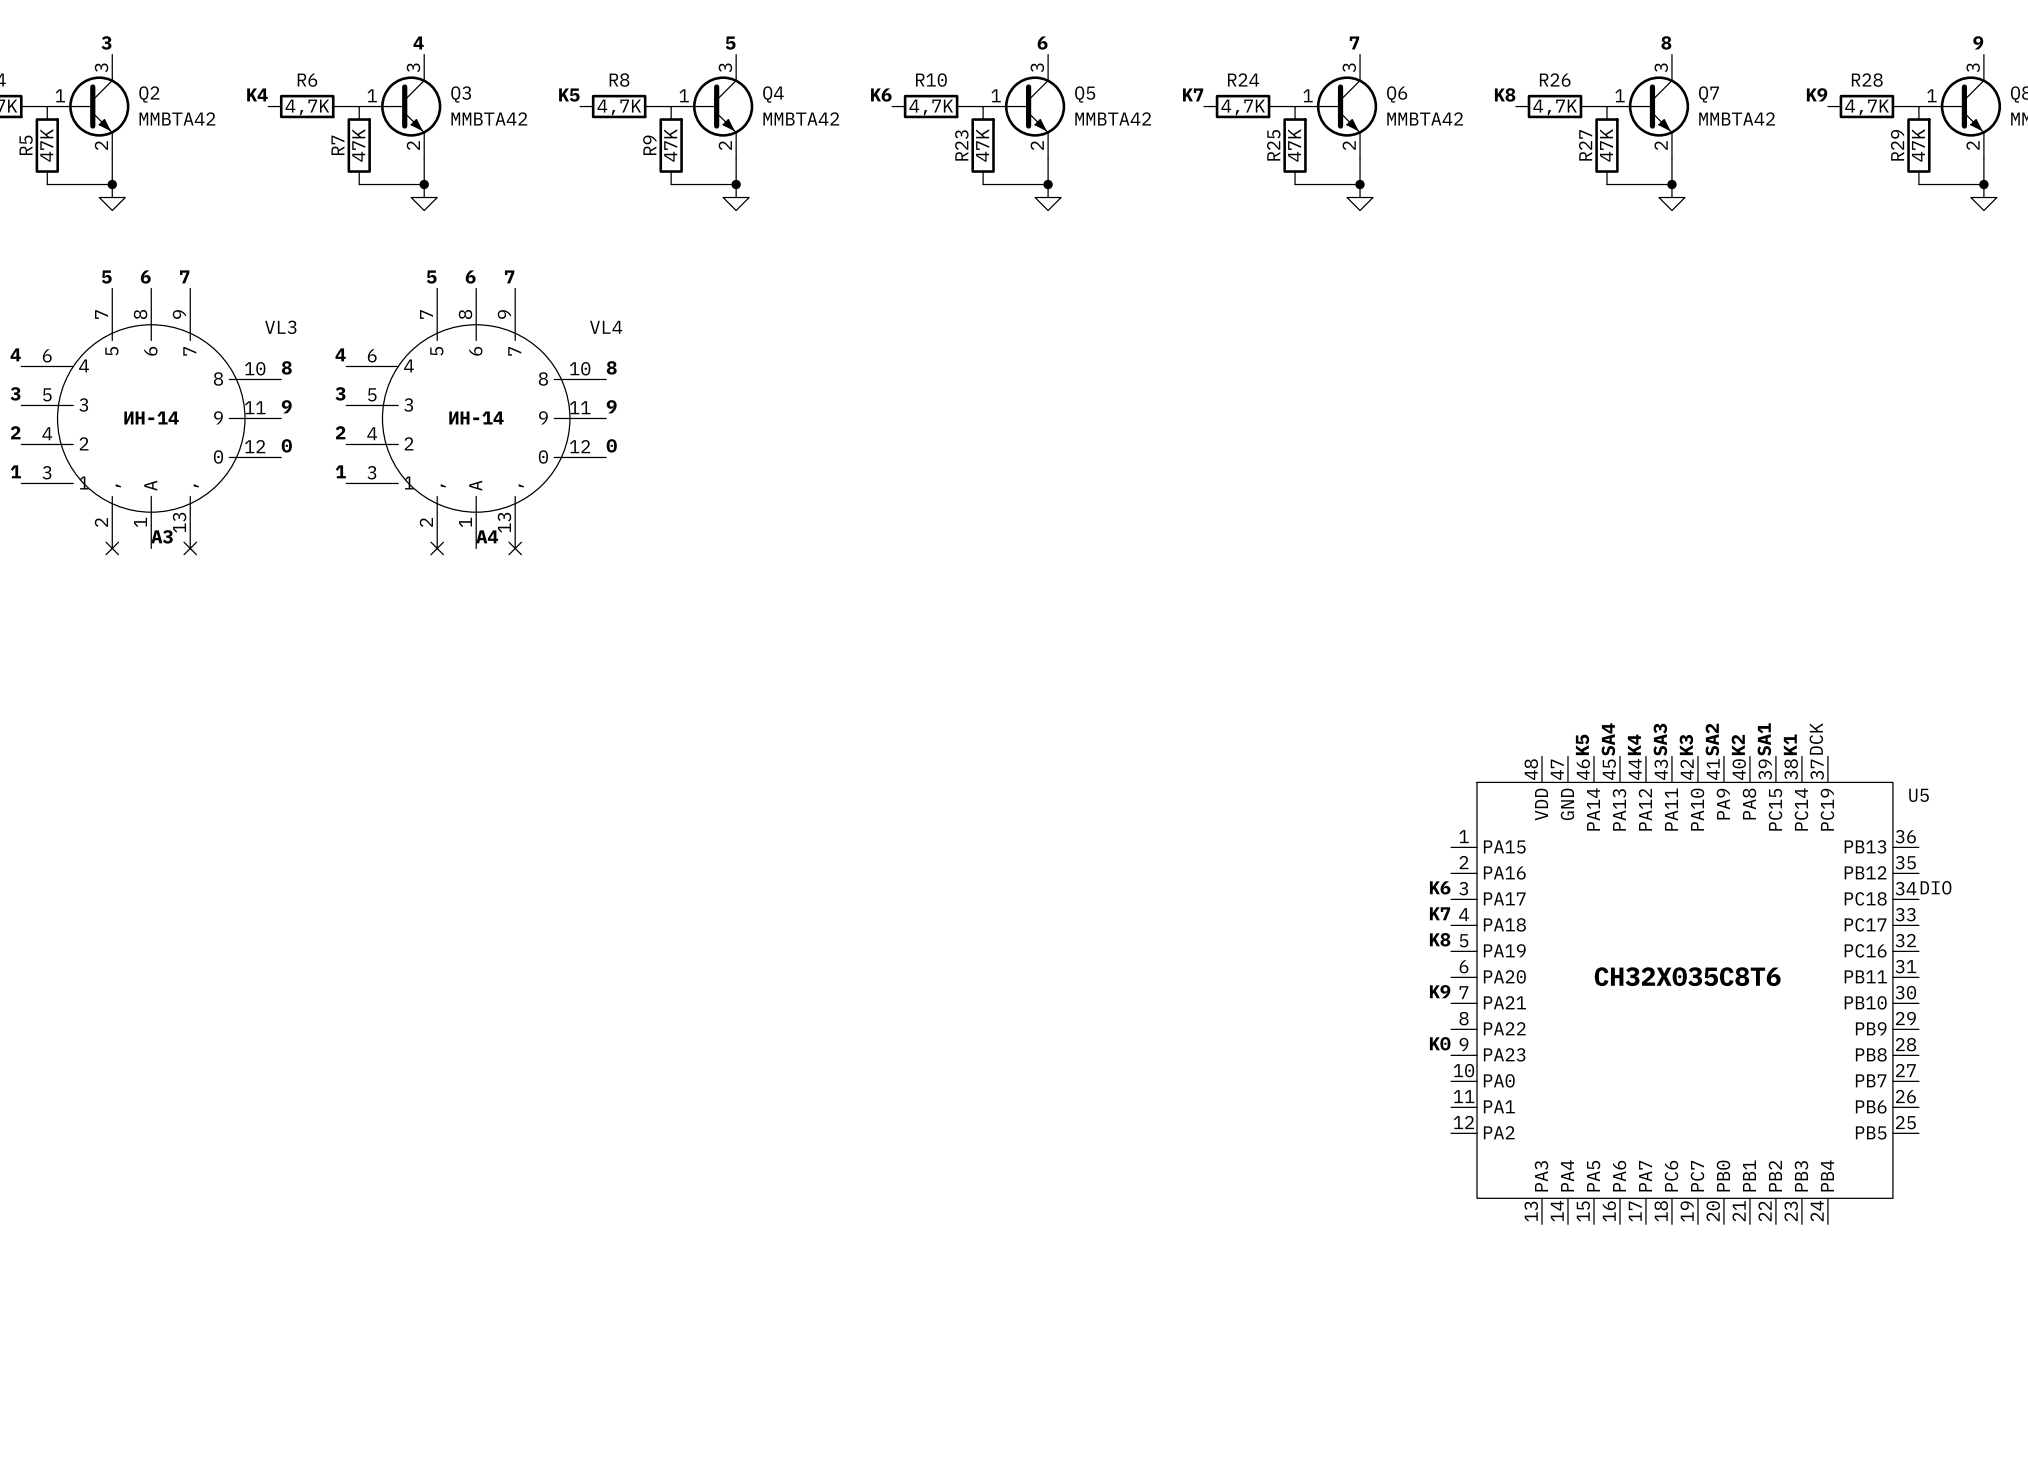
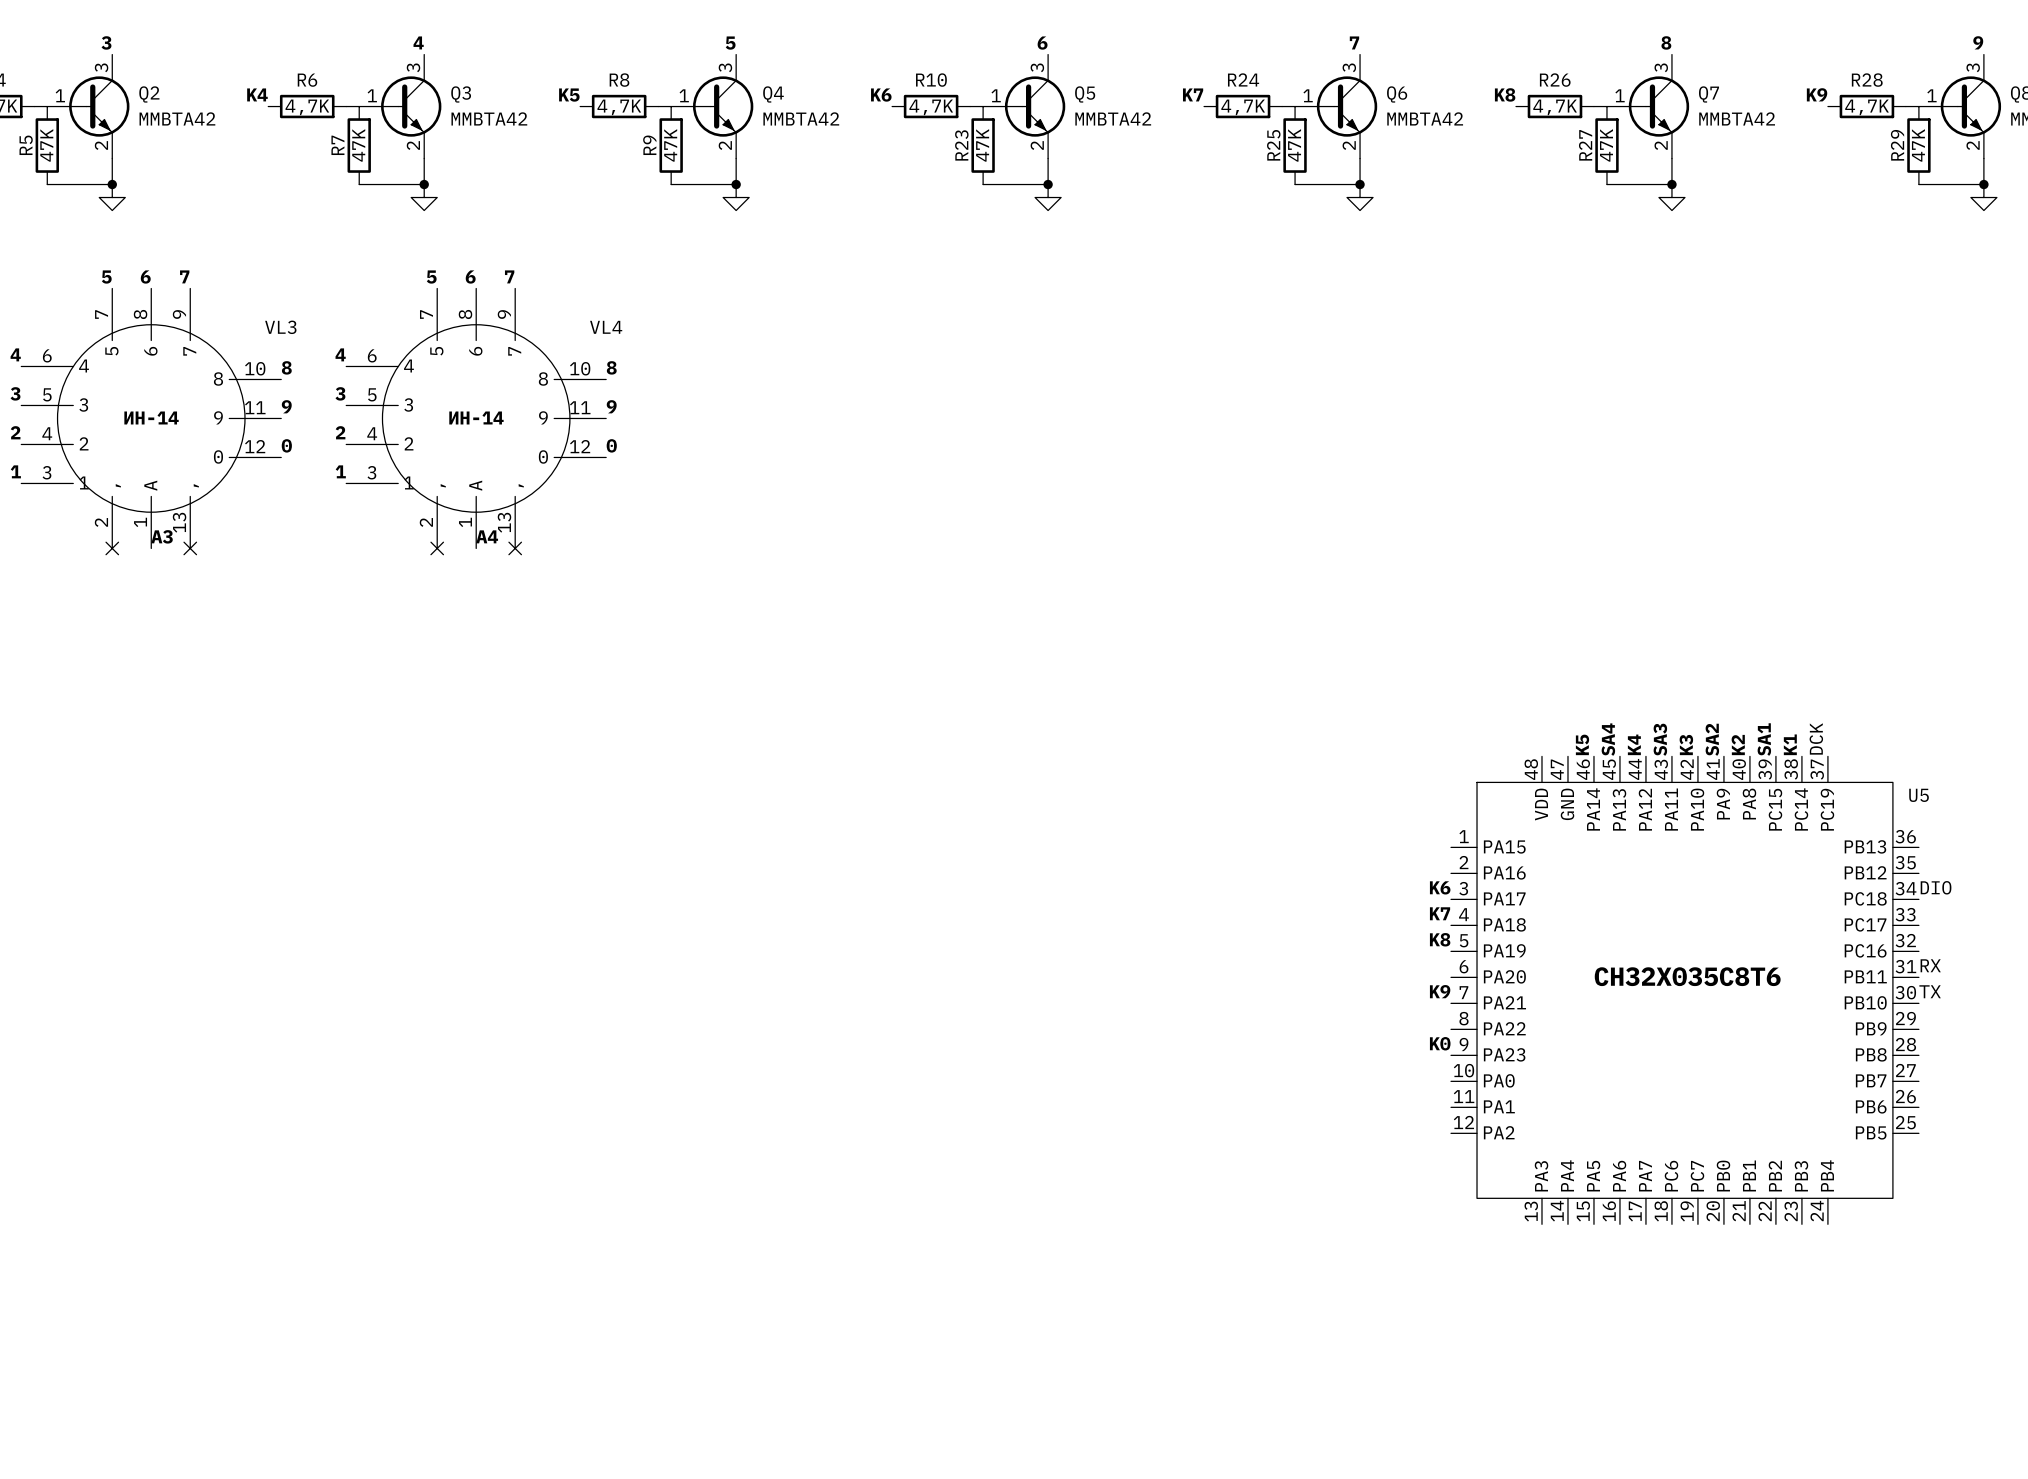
label: none -> RX (1930, 965)
label: none -> TX (1930, 991)

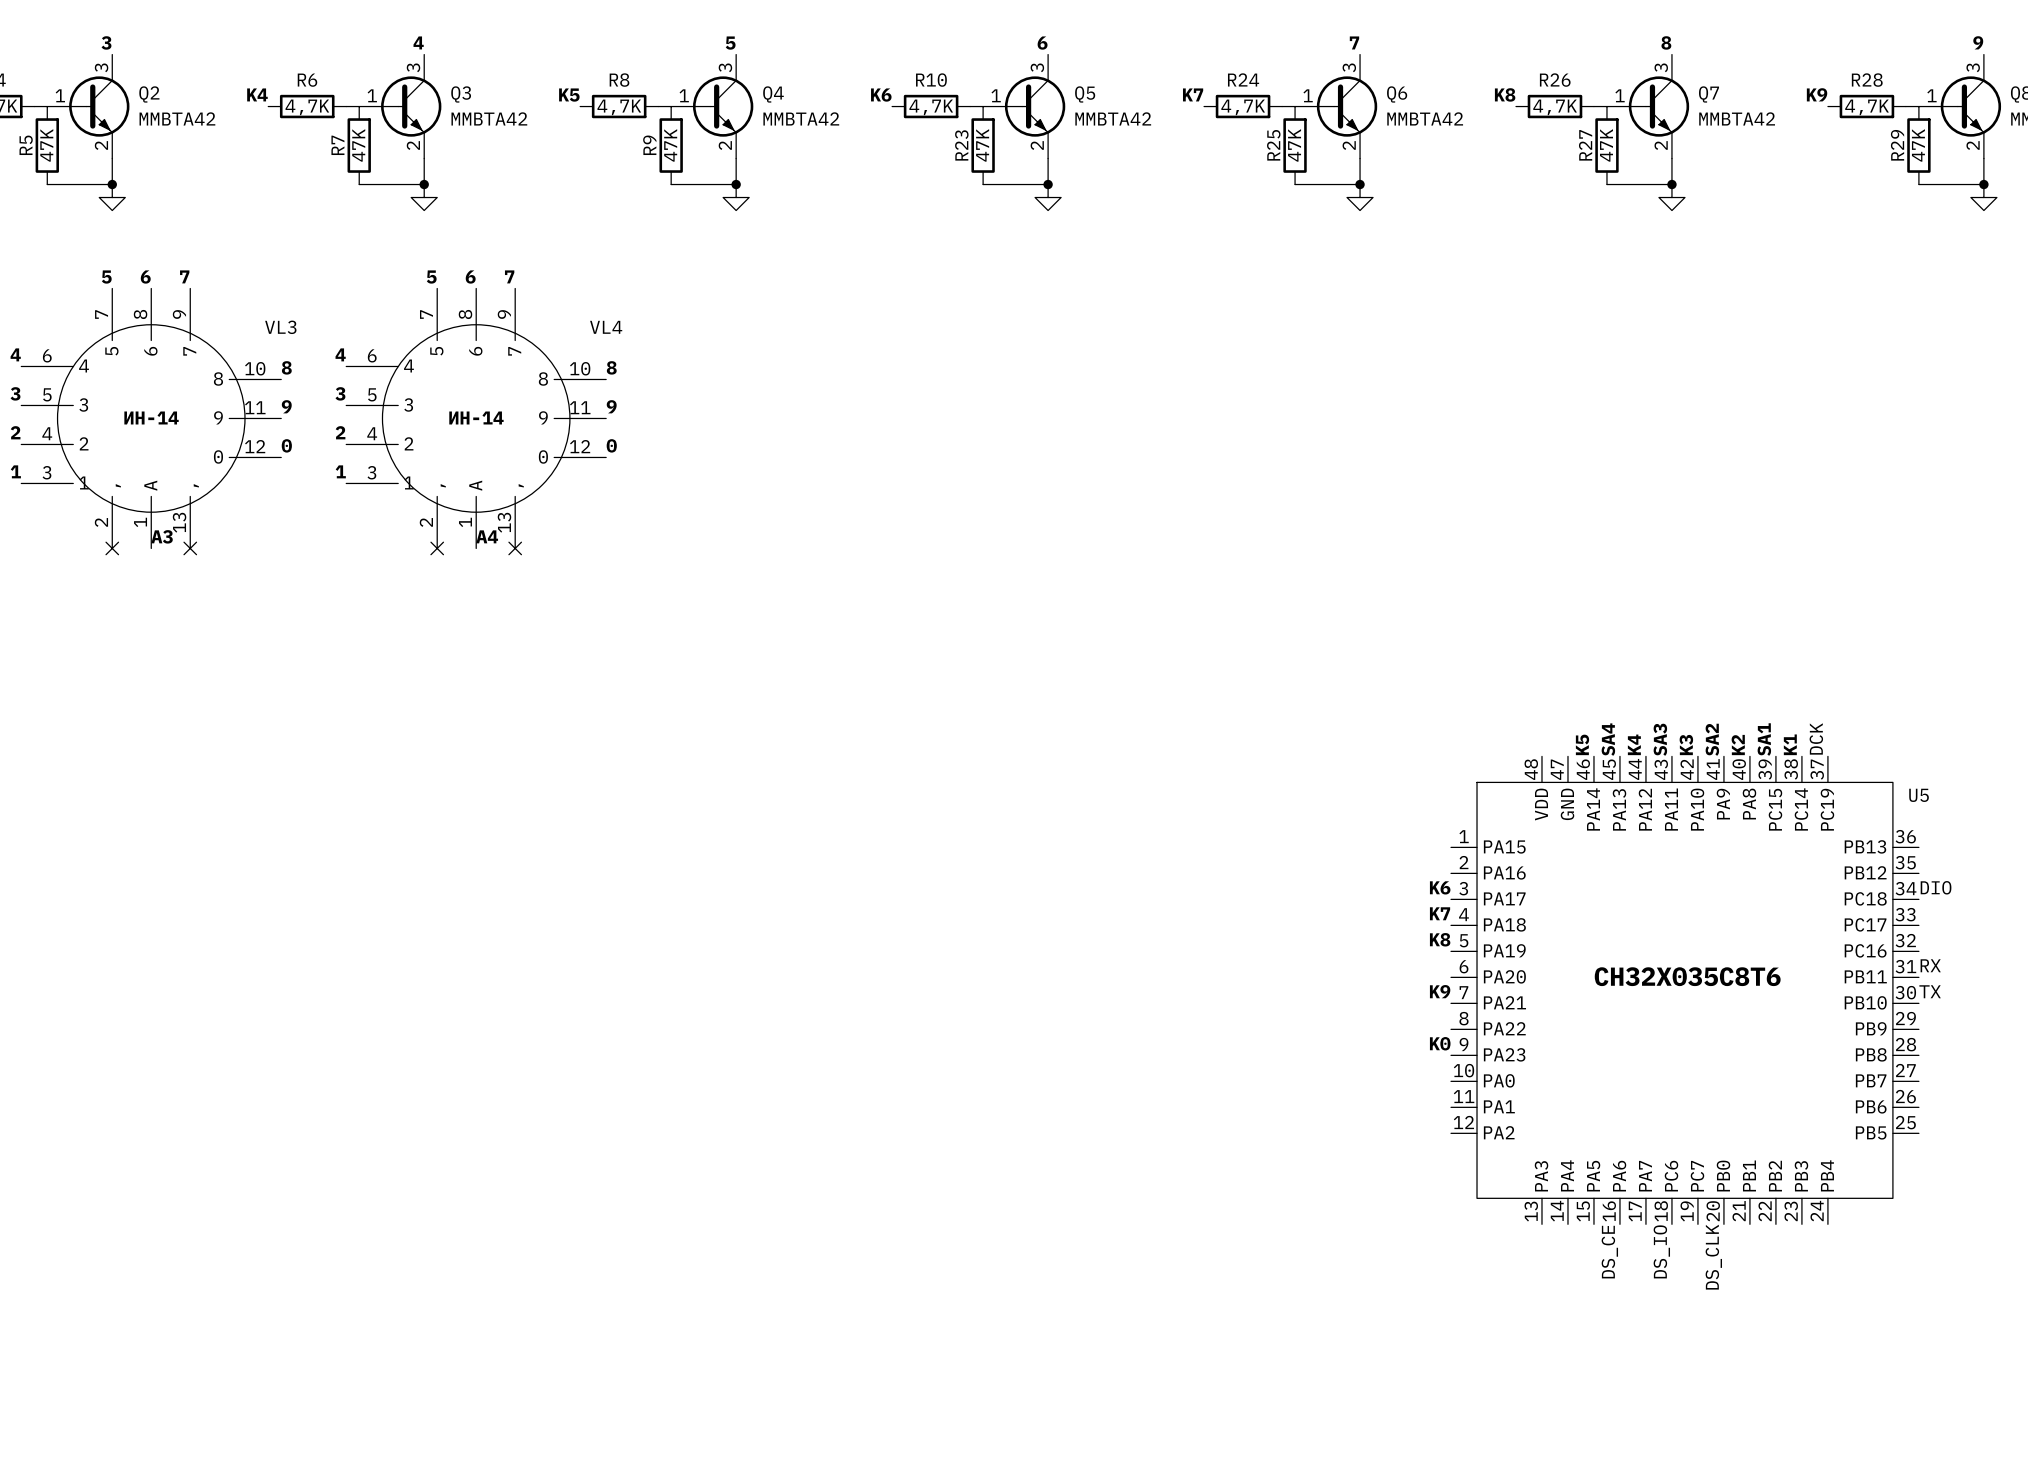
label: none -> DS_IO (1661, 1251)
label: none -> DS_CE (1609, 1252)
label: none -> DS_CLK (1713, 1257)

